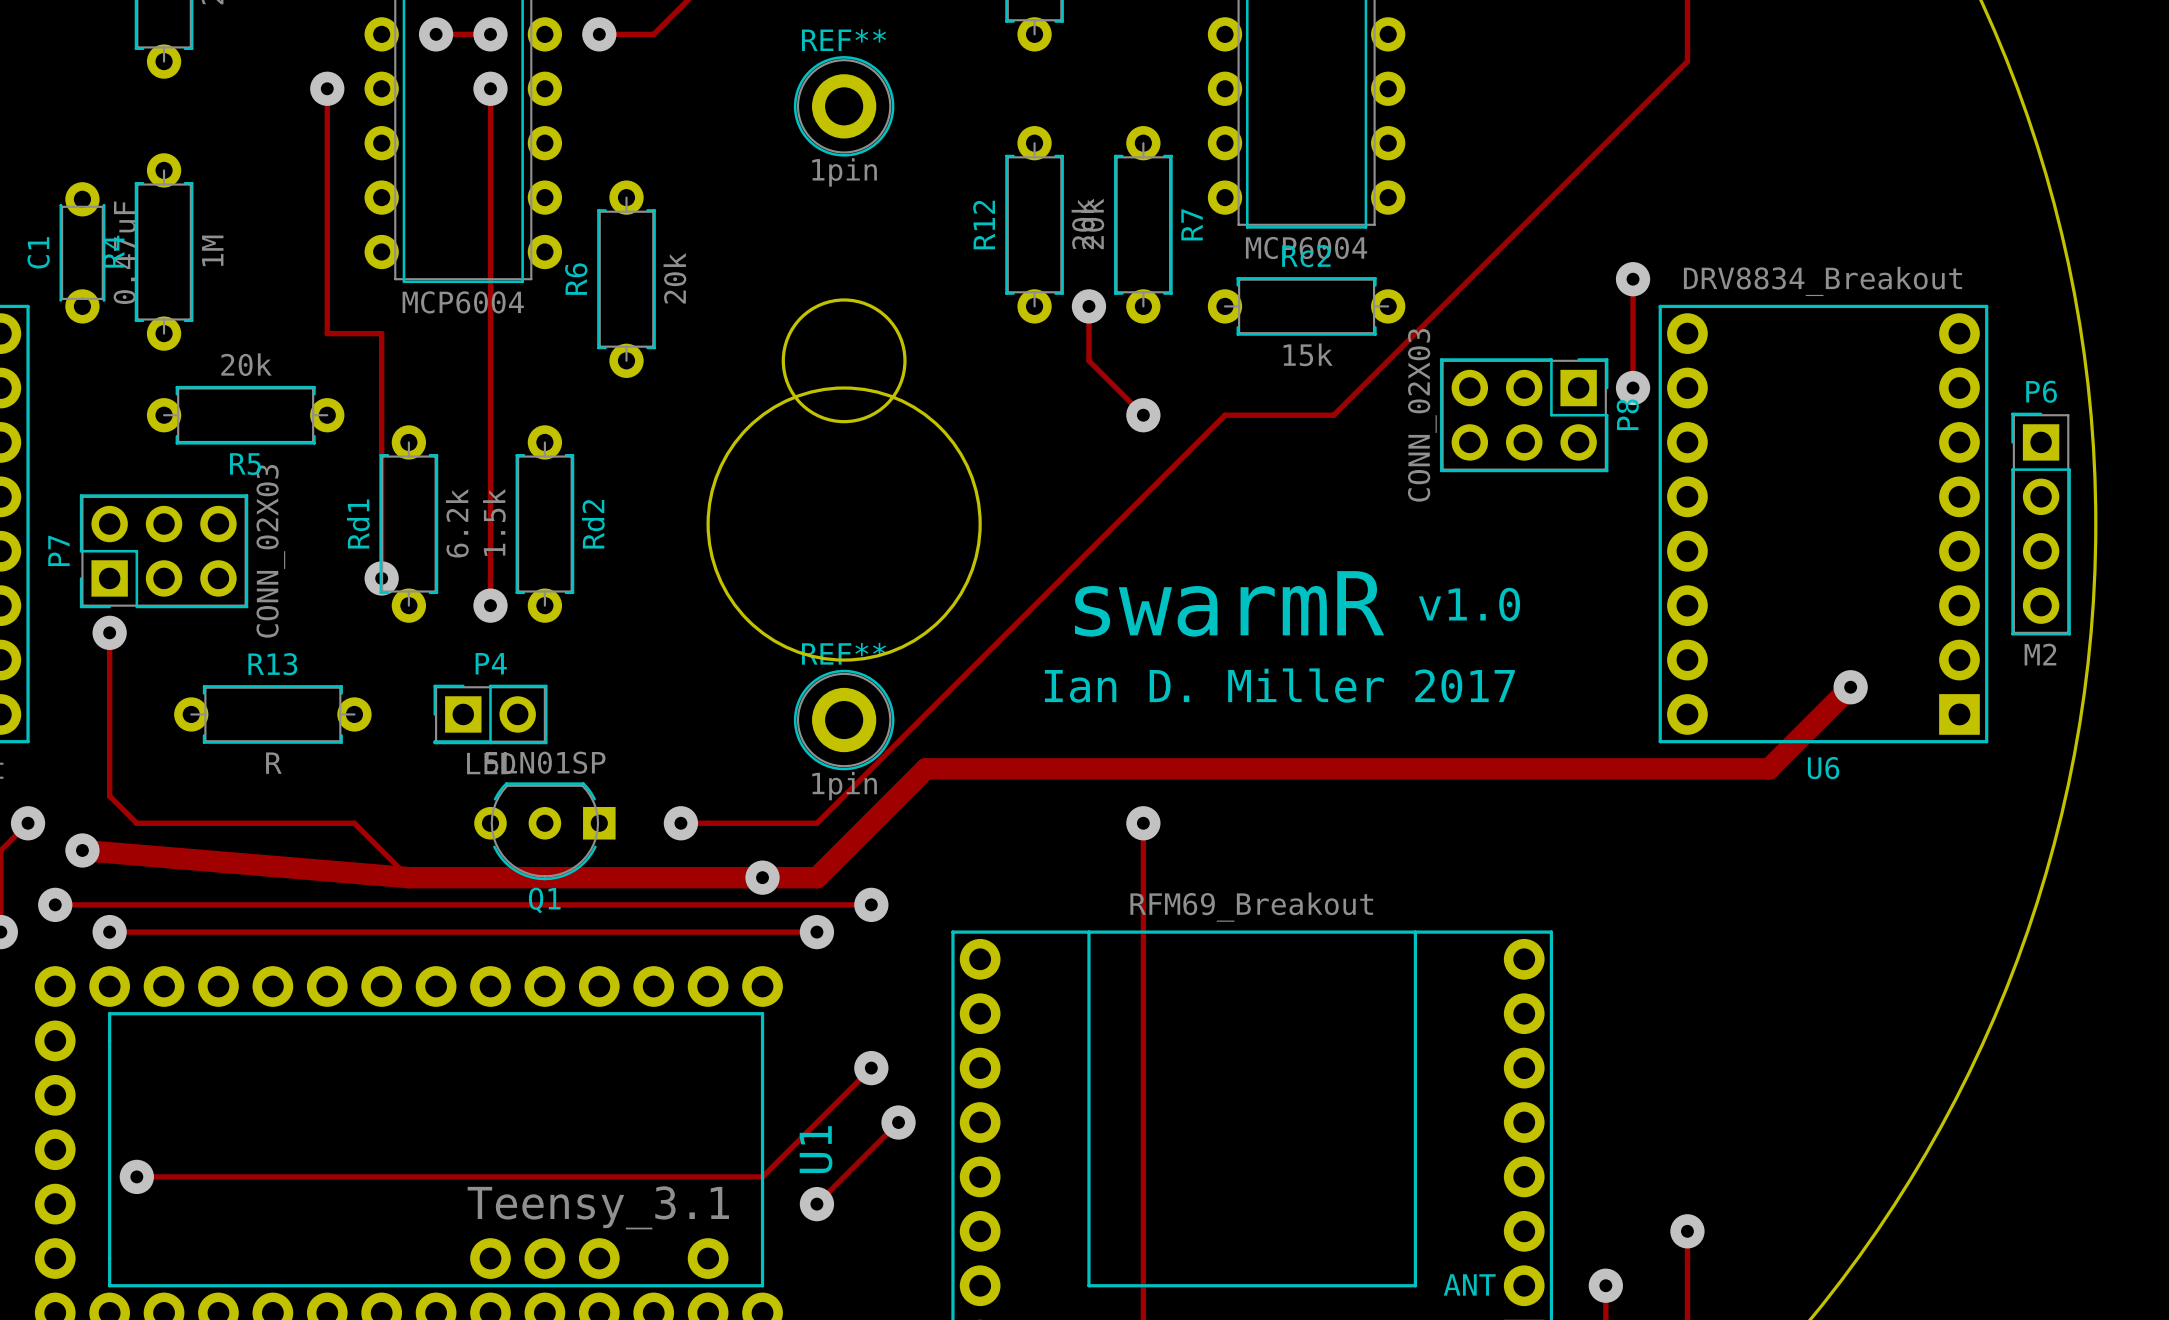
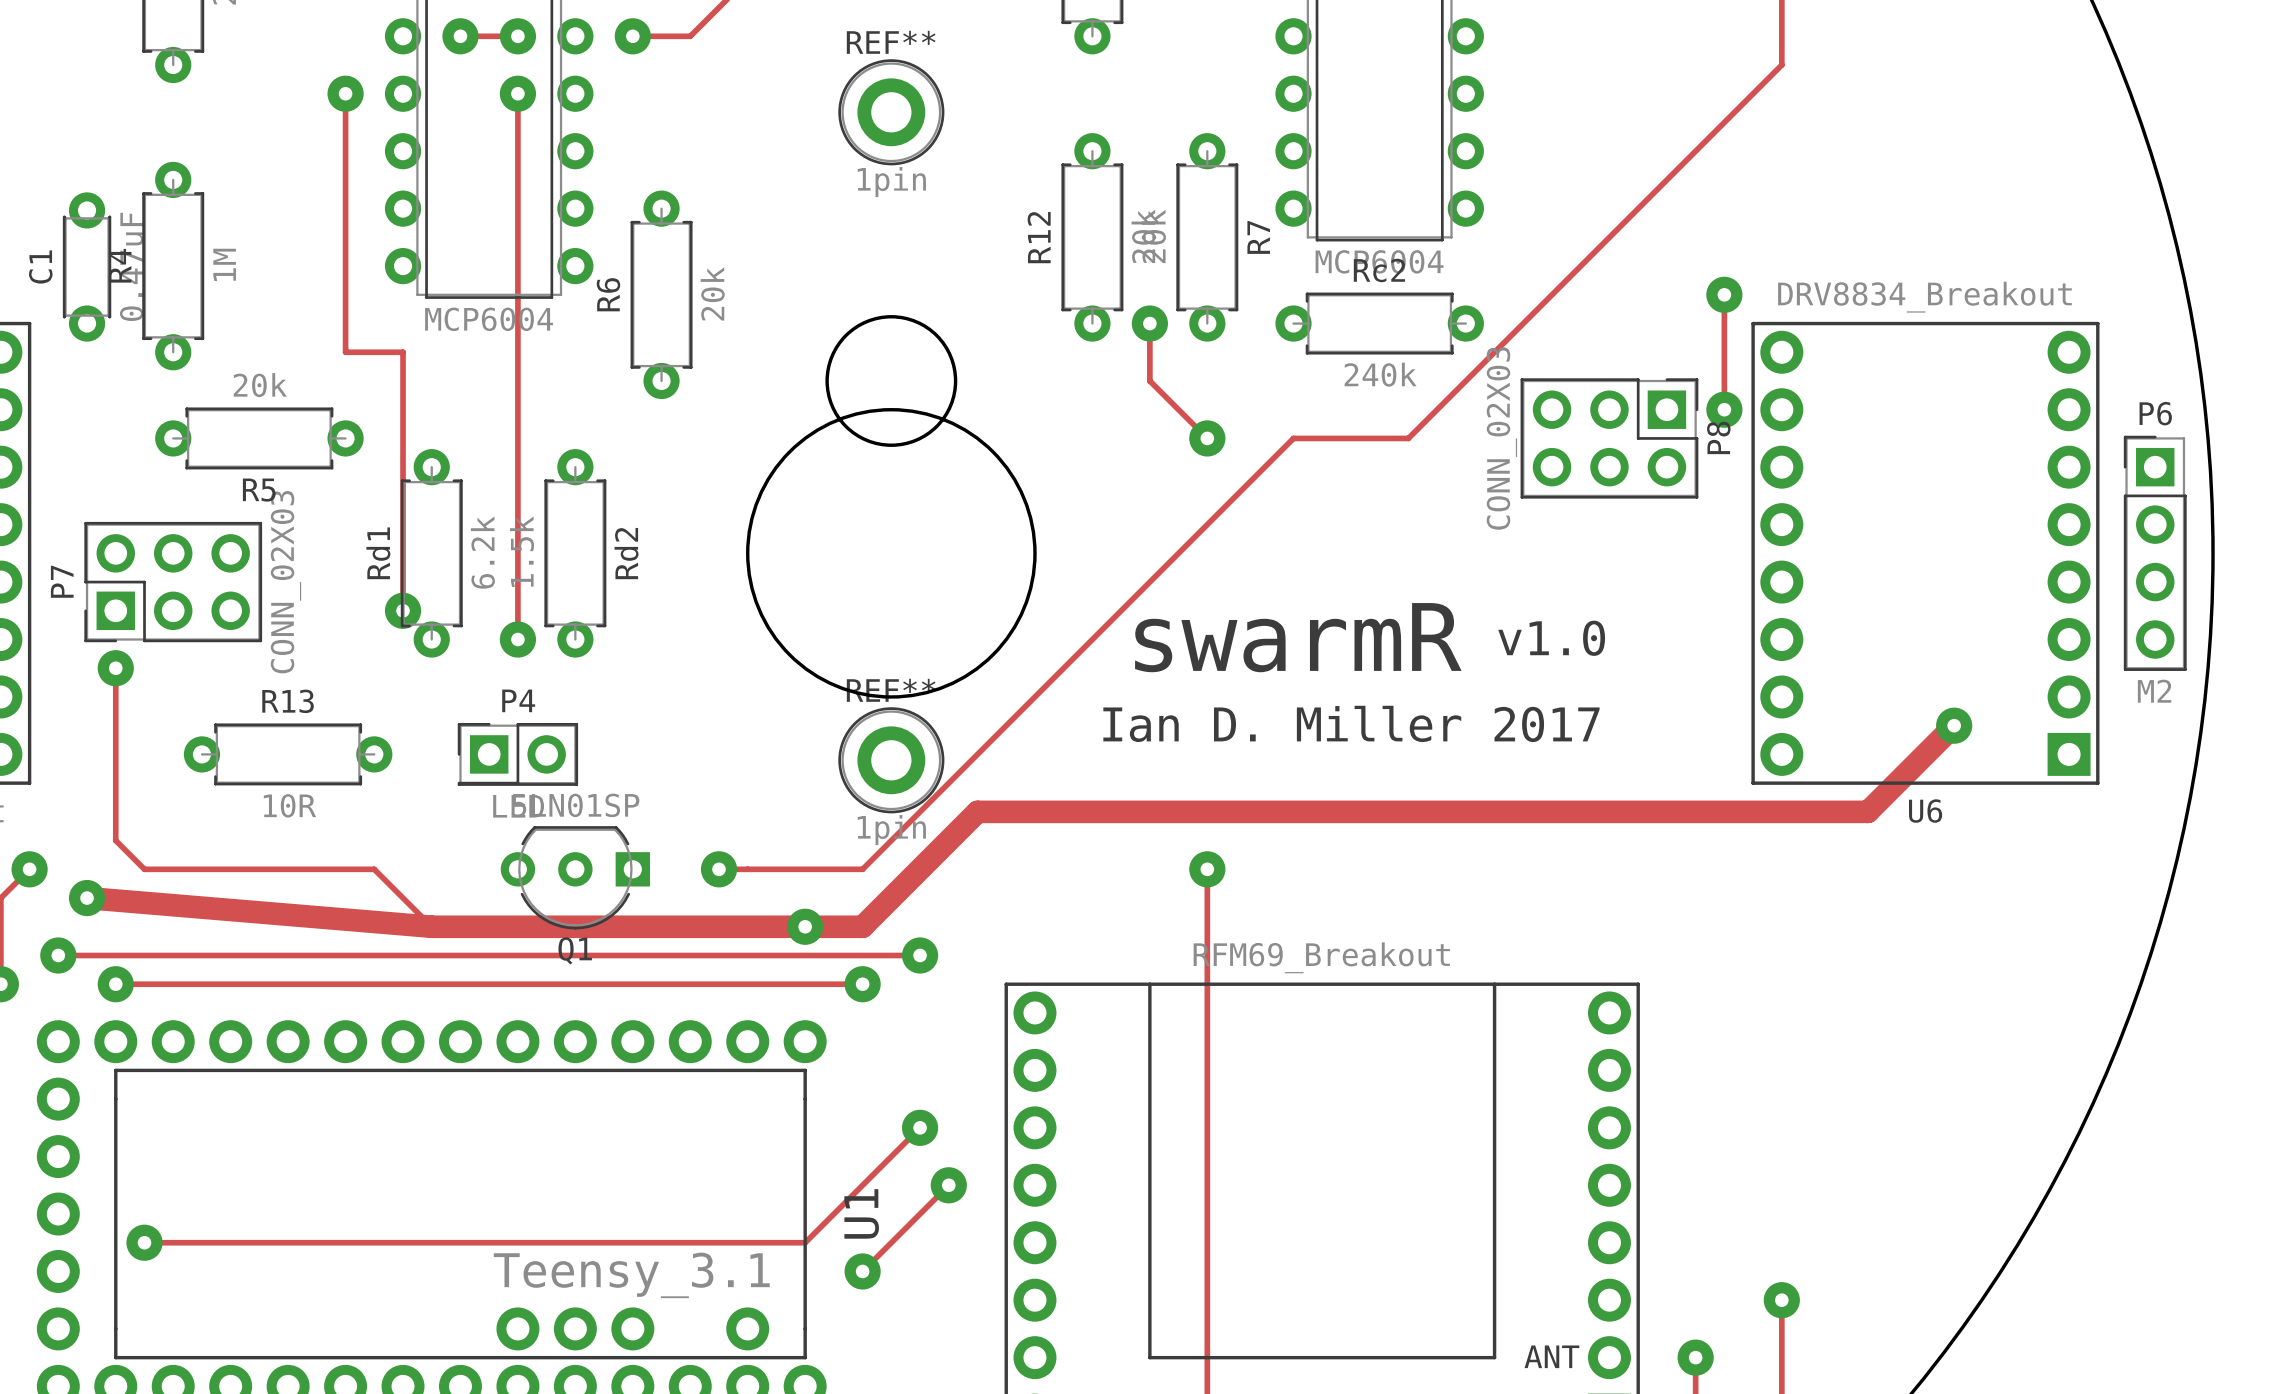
Rc2 value: 15k (1308, 354) -> 240k (1380, 374)
R13 value: R (273, 763) -> 10R (289, 805)

